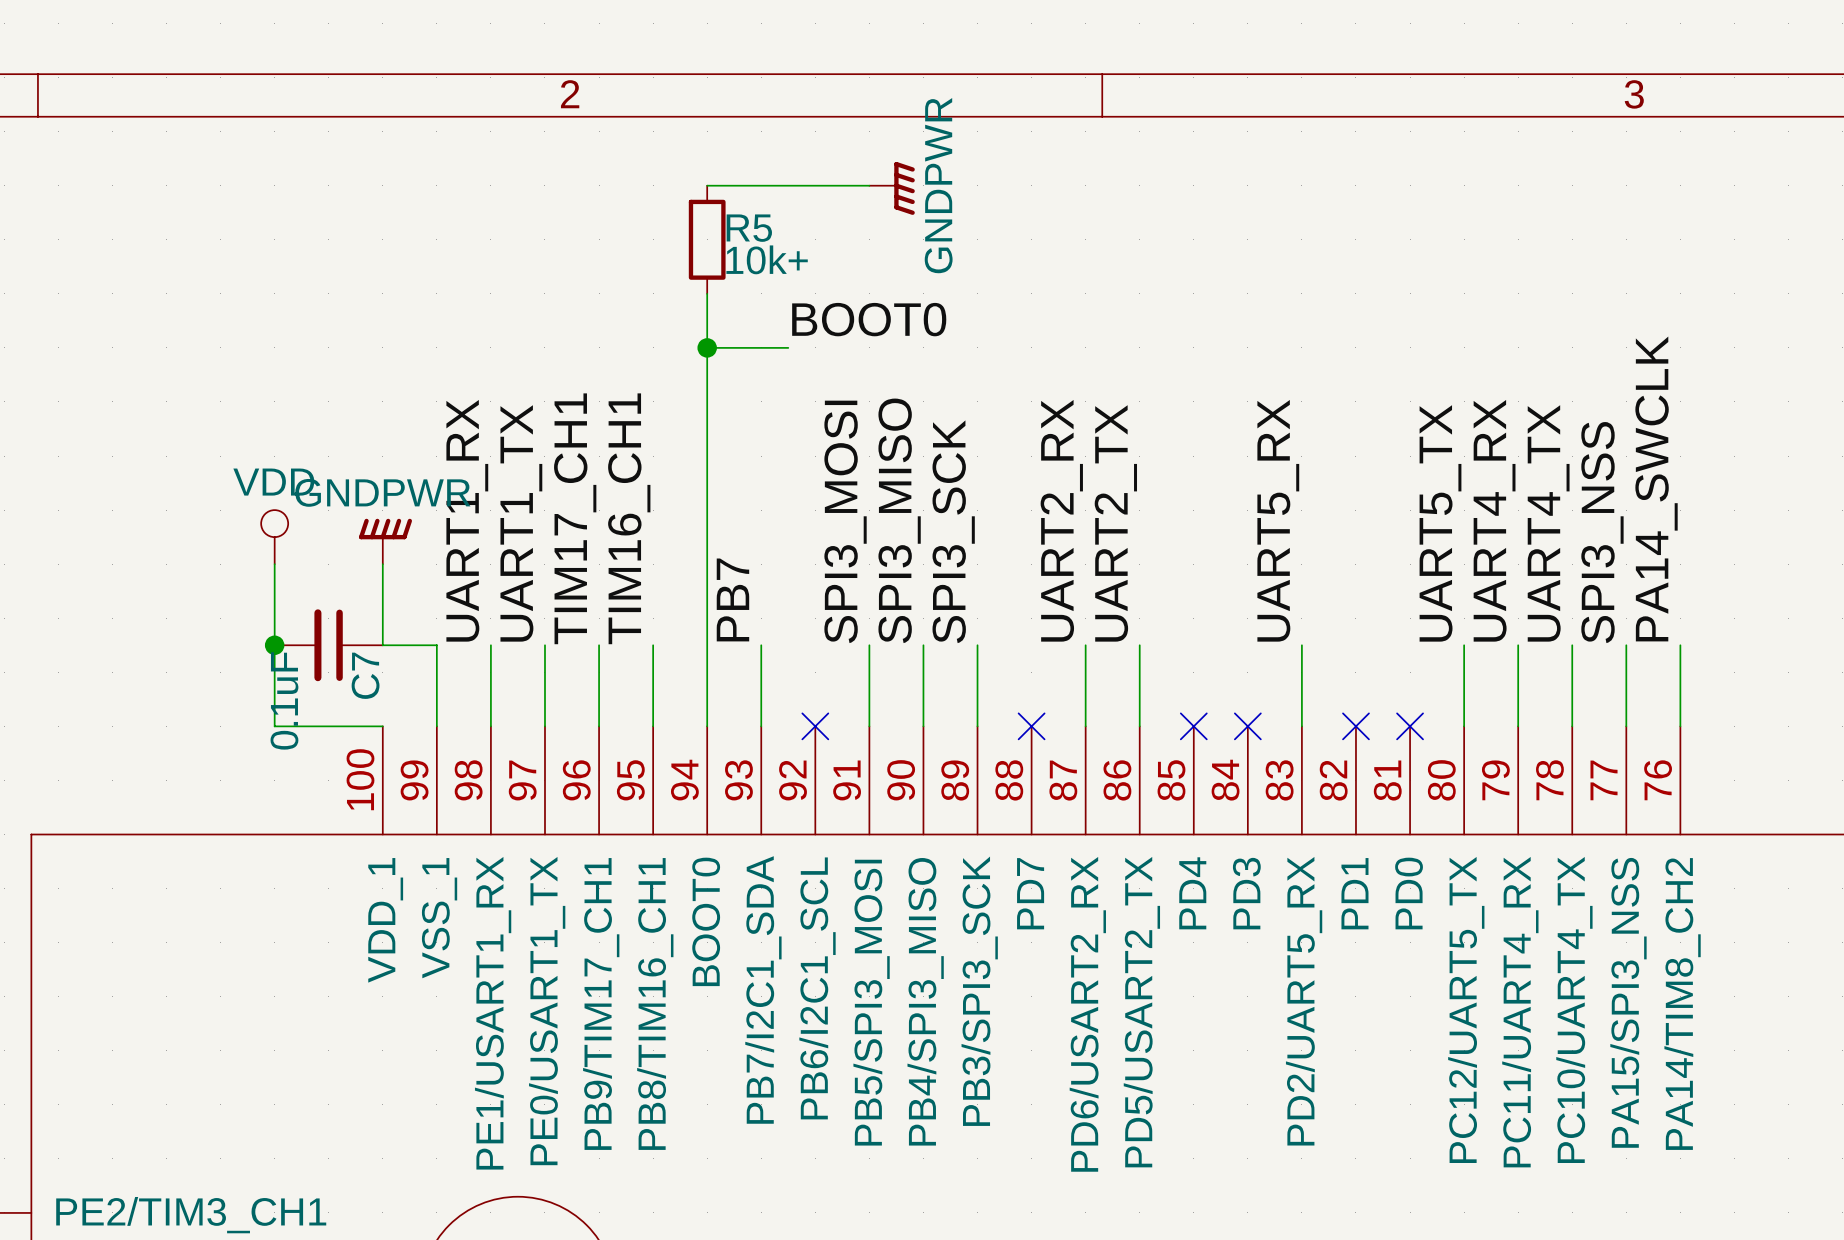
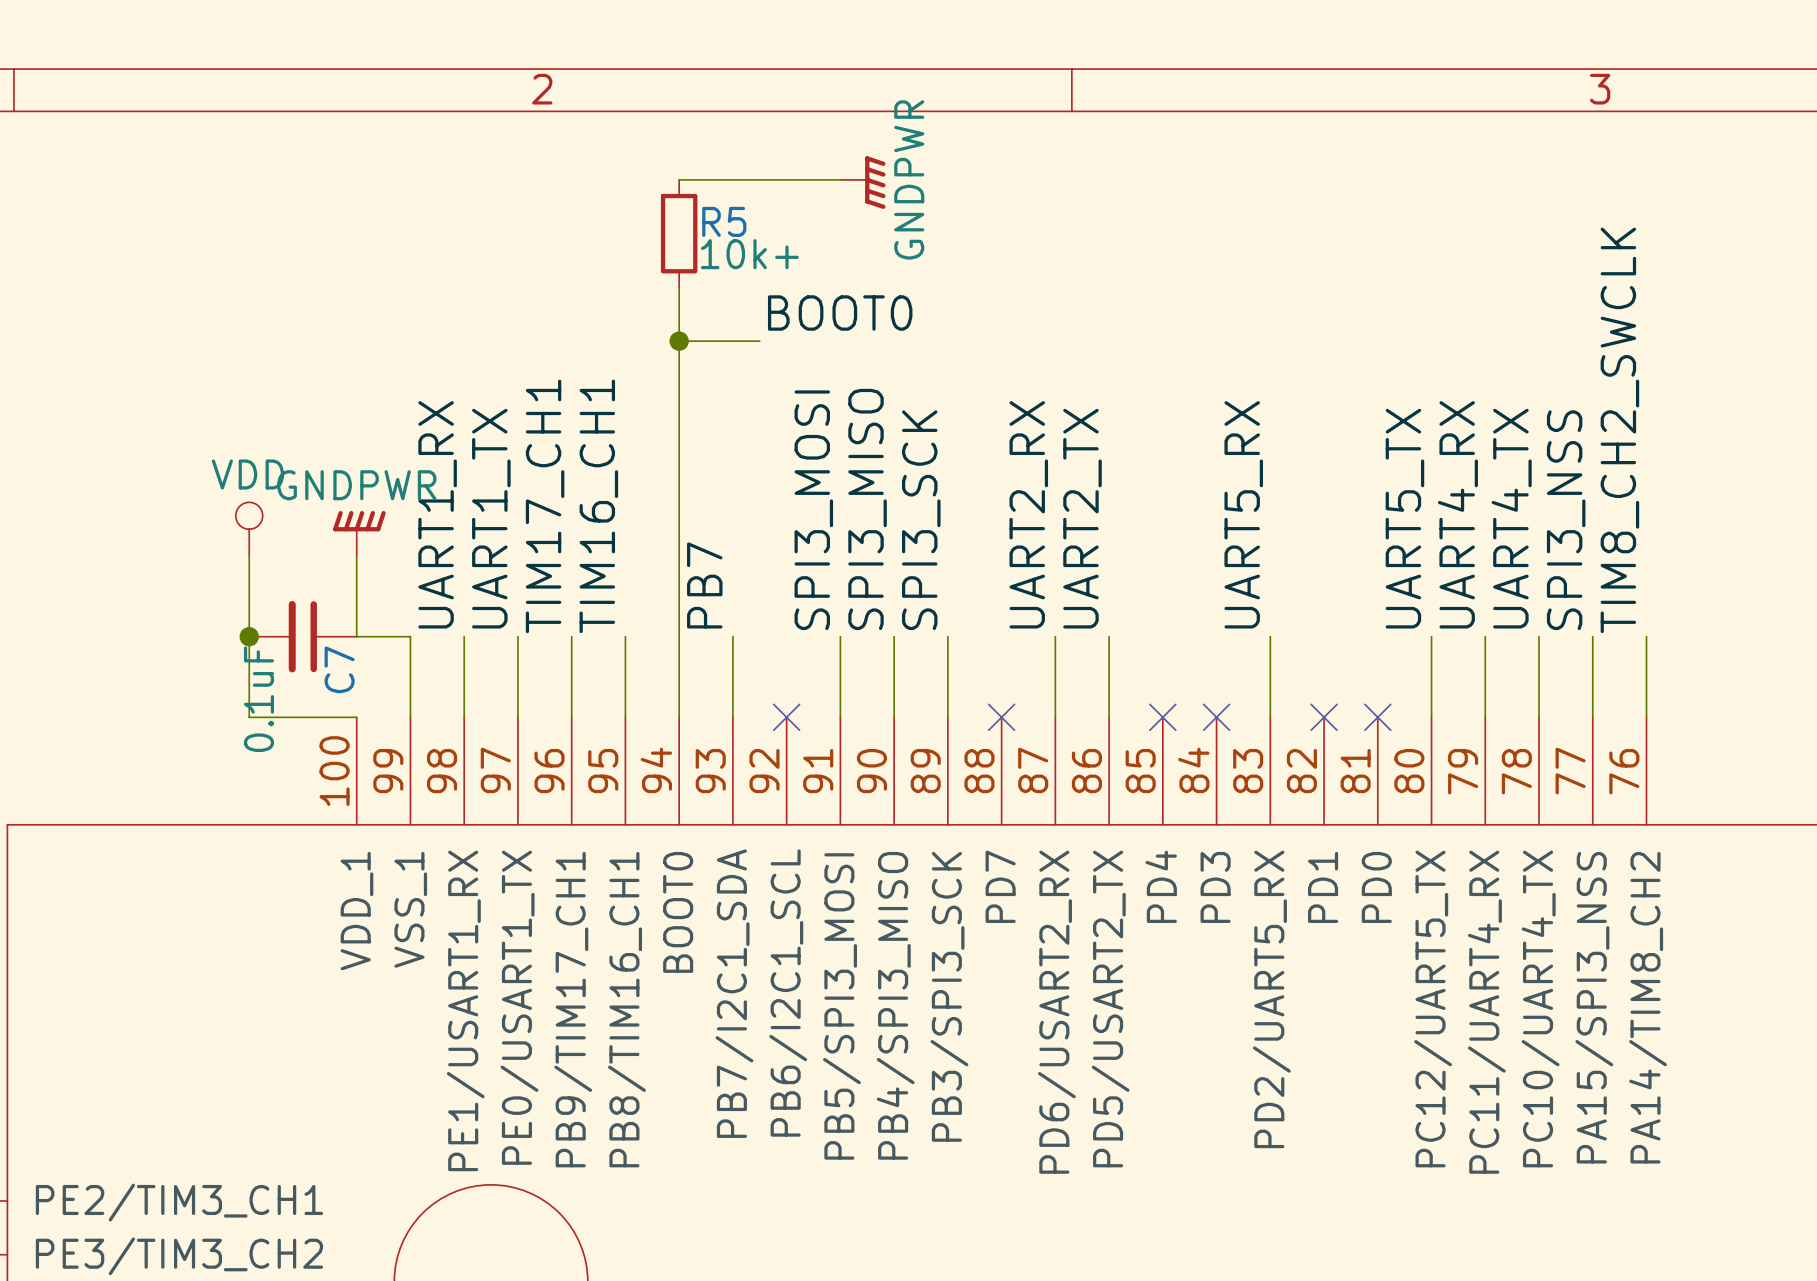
label: PA14_SWCLK (1656, 488) -> TIM8_CH2_SWCLK (1619, 430)

